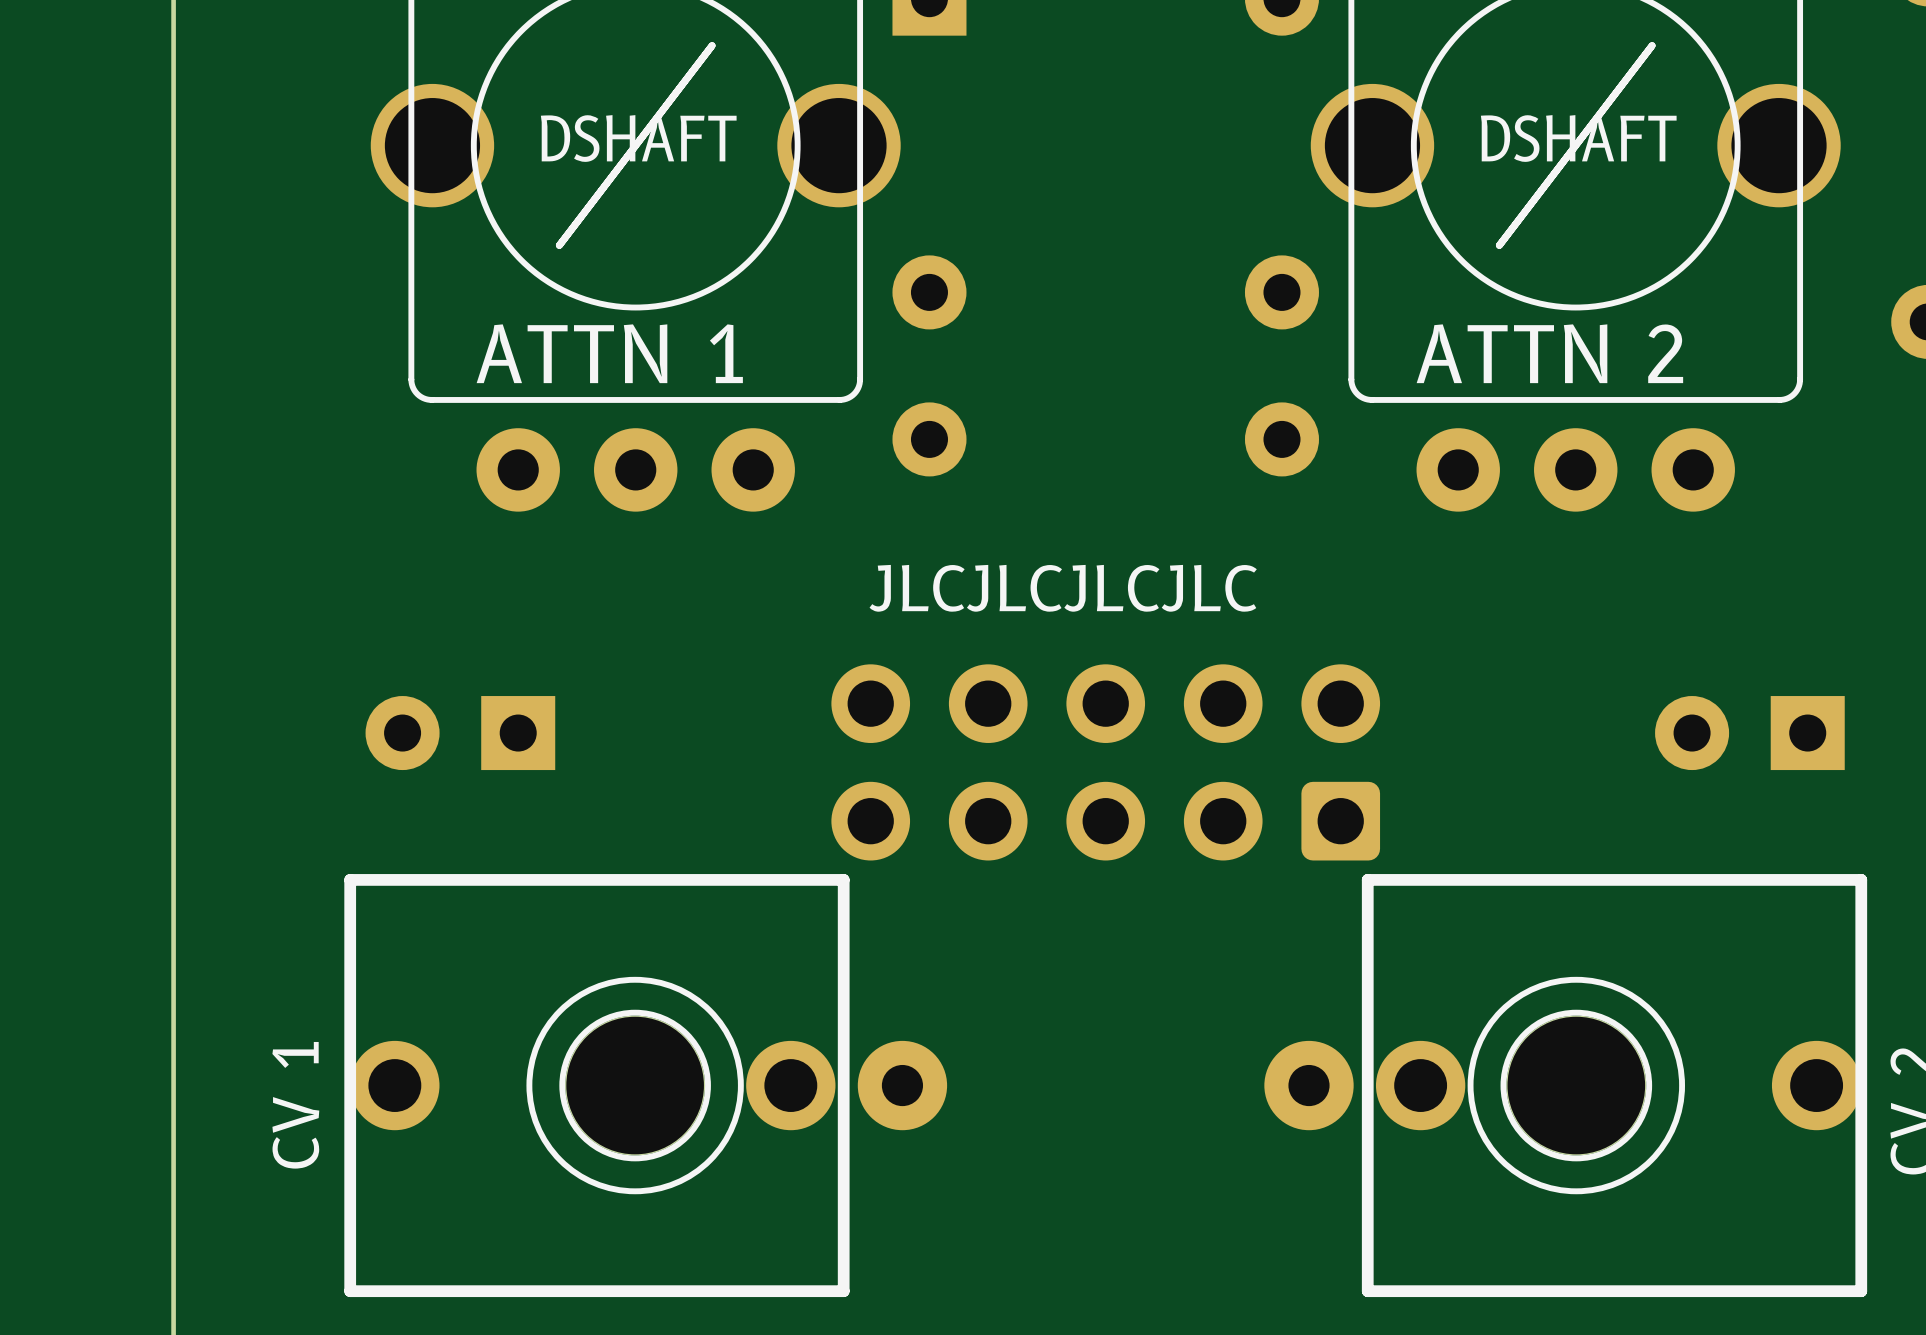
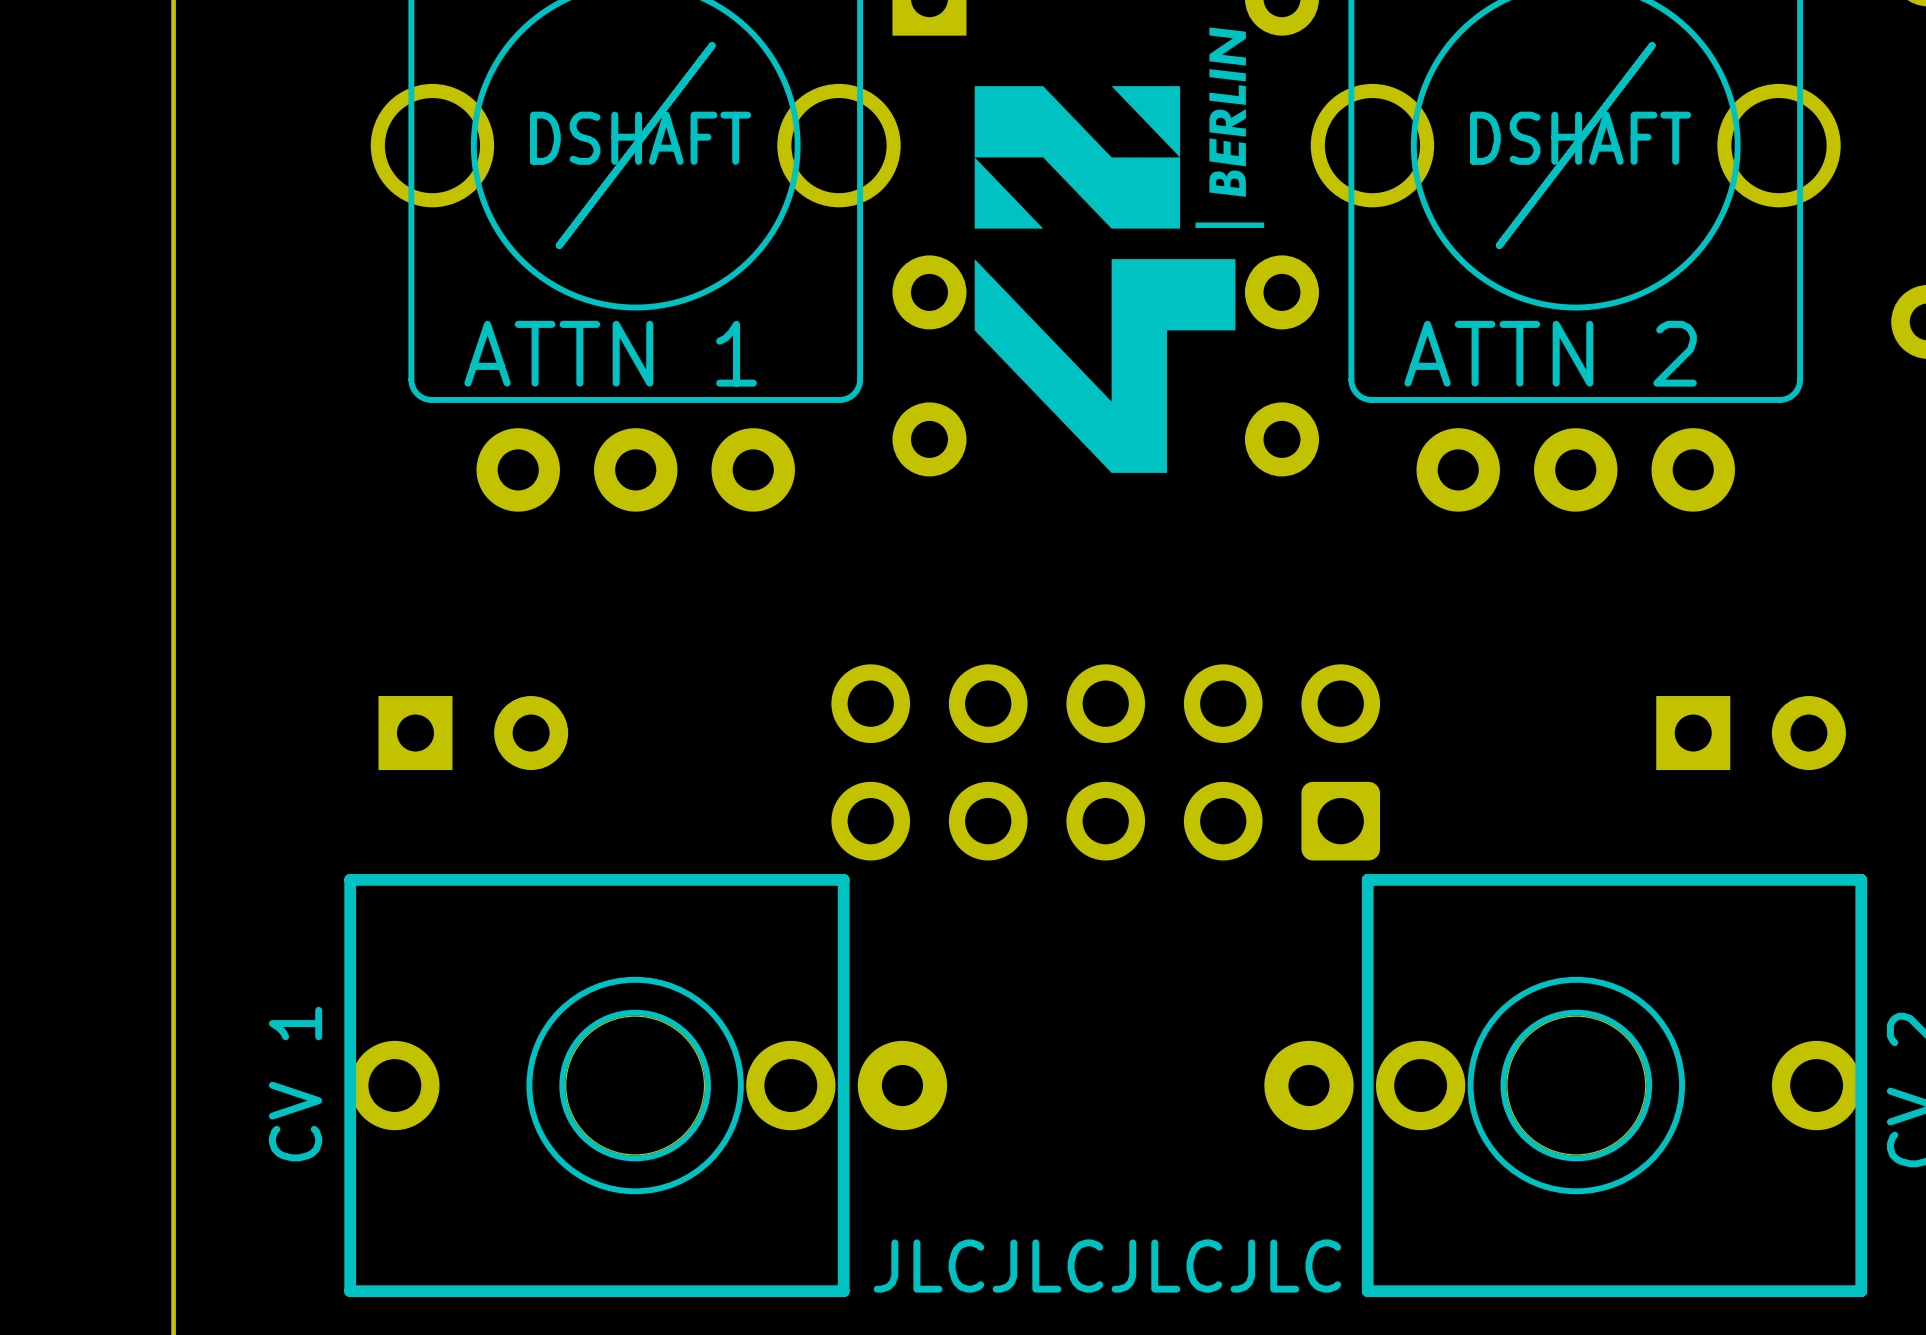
drawing: none -> [974, 27, 1265, 473]
text position: JLCJLCJLCJLC (1063, 588) -> JLCJLCJLCJLC (1107, 1266)
part rotation: 0° (460, 733) -> 180° (473, 733)
part rotation: 0° (1749, 733) -> 180° (1751, 733)

